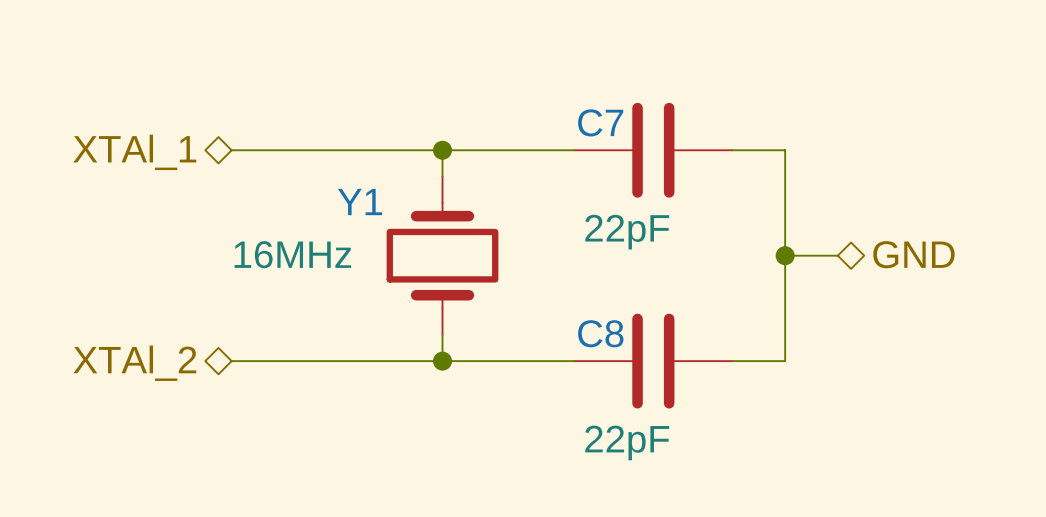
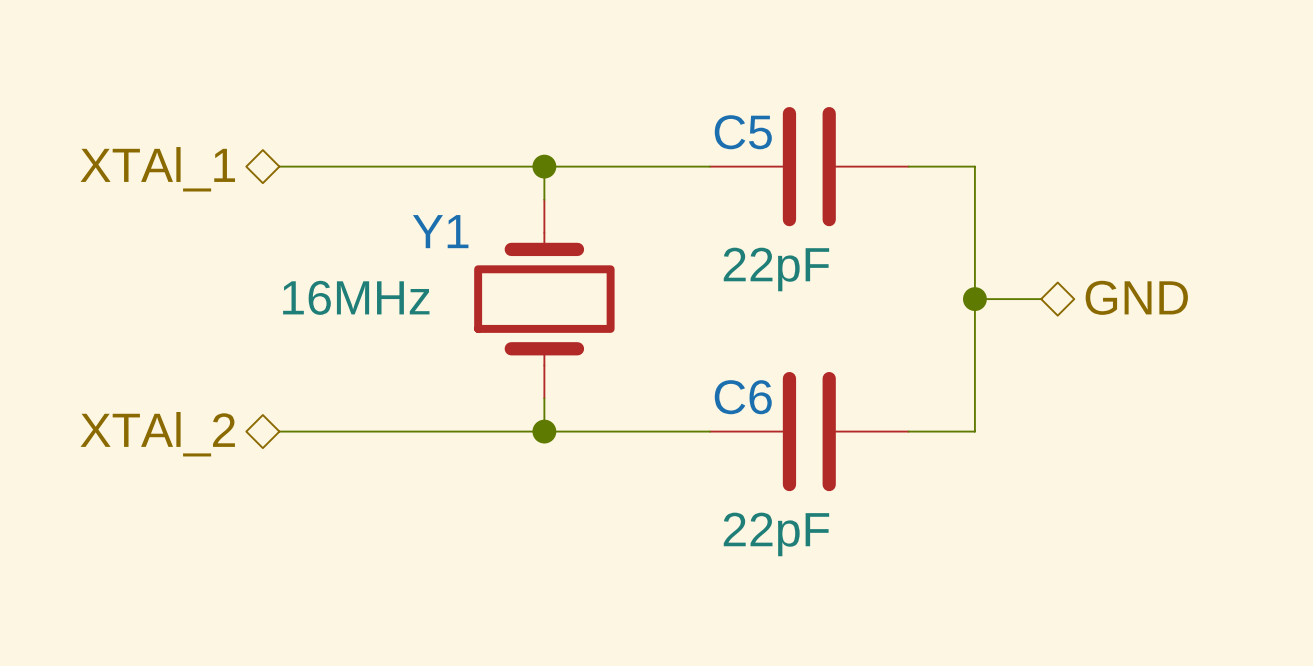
C7 name: C7 (600, 122) -> C5 (743, 132)
C8 name: C8 (600, 333) -> C6 (743, 397)

